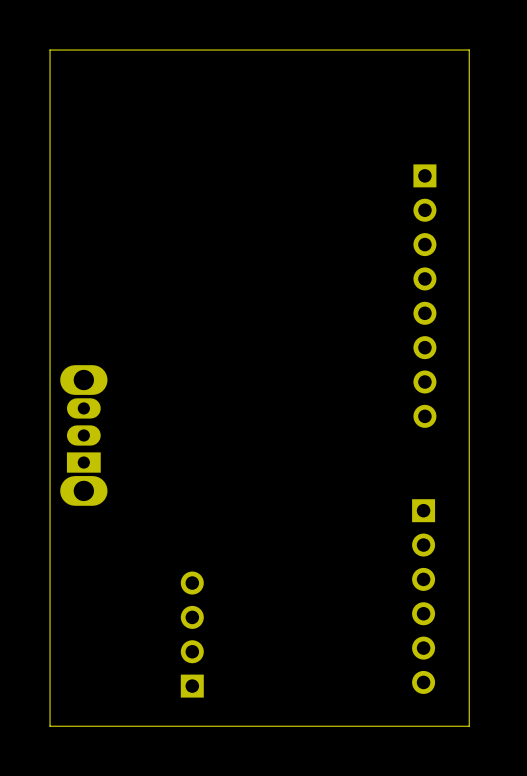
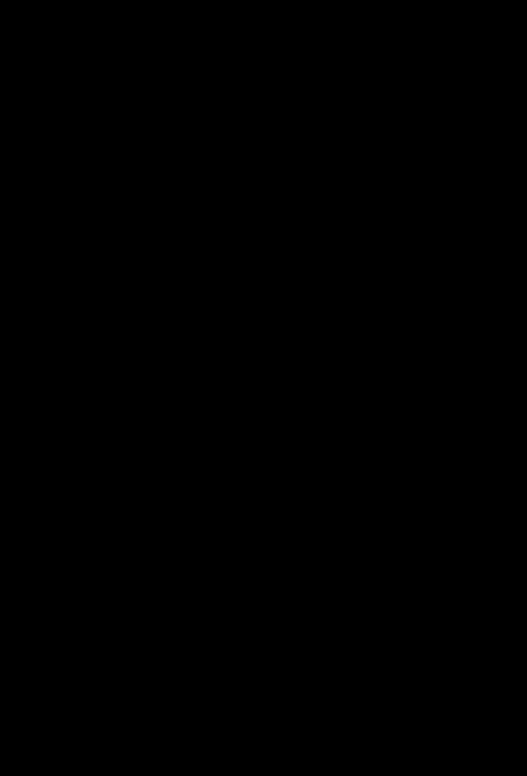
board edge: (469, 50) (50, 50) (50, 726) (469, 726) (469, 50) -> none
part: (424, 296) -> none
part: (83, 435) -> none
part: (423, 596) -> none
part: (192, 634) -> none

